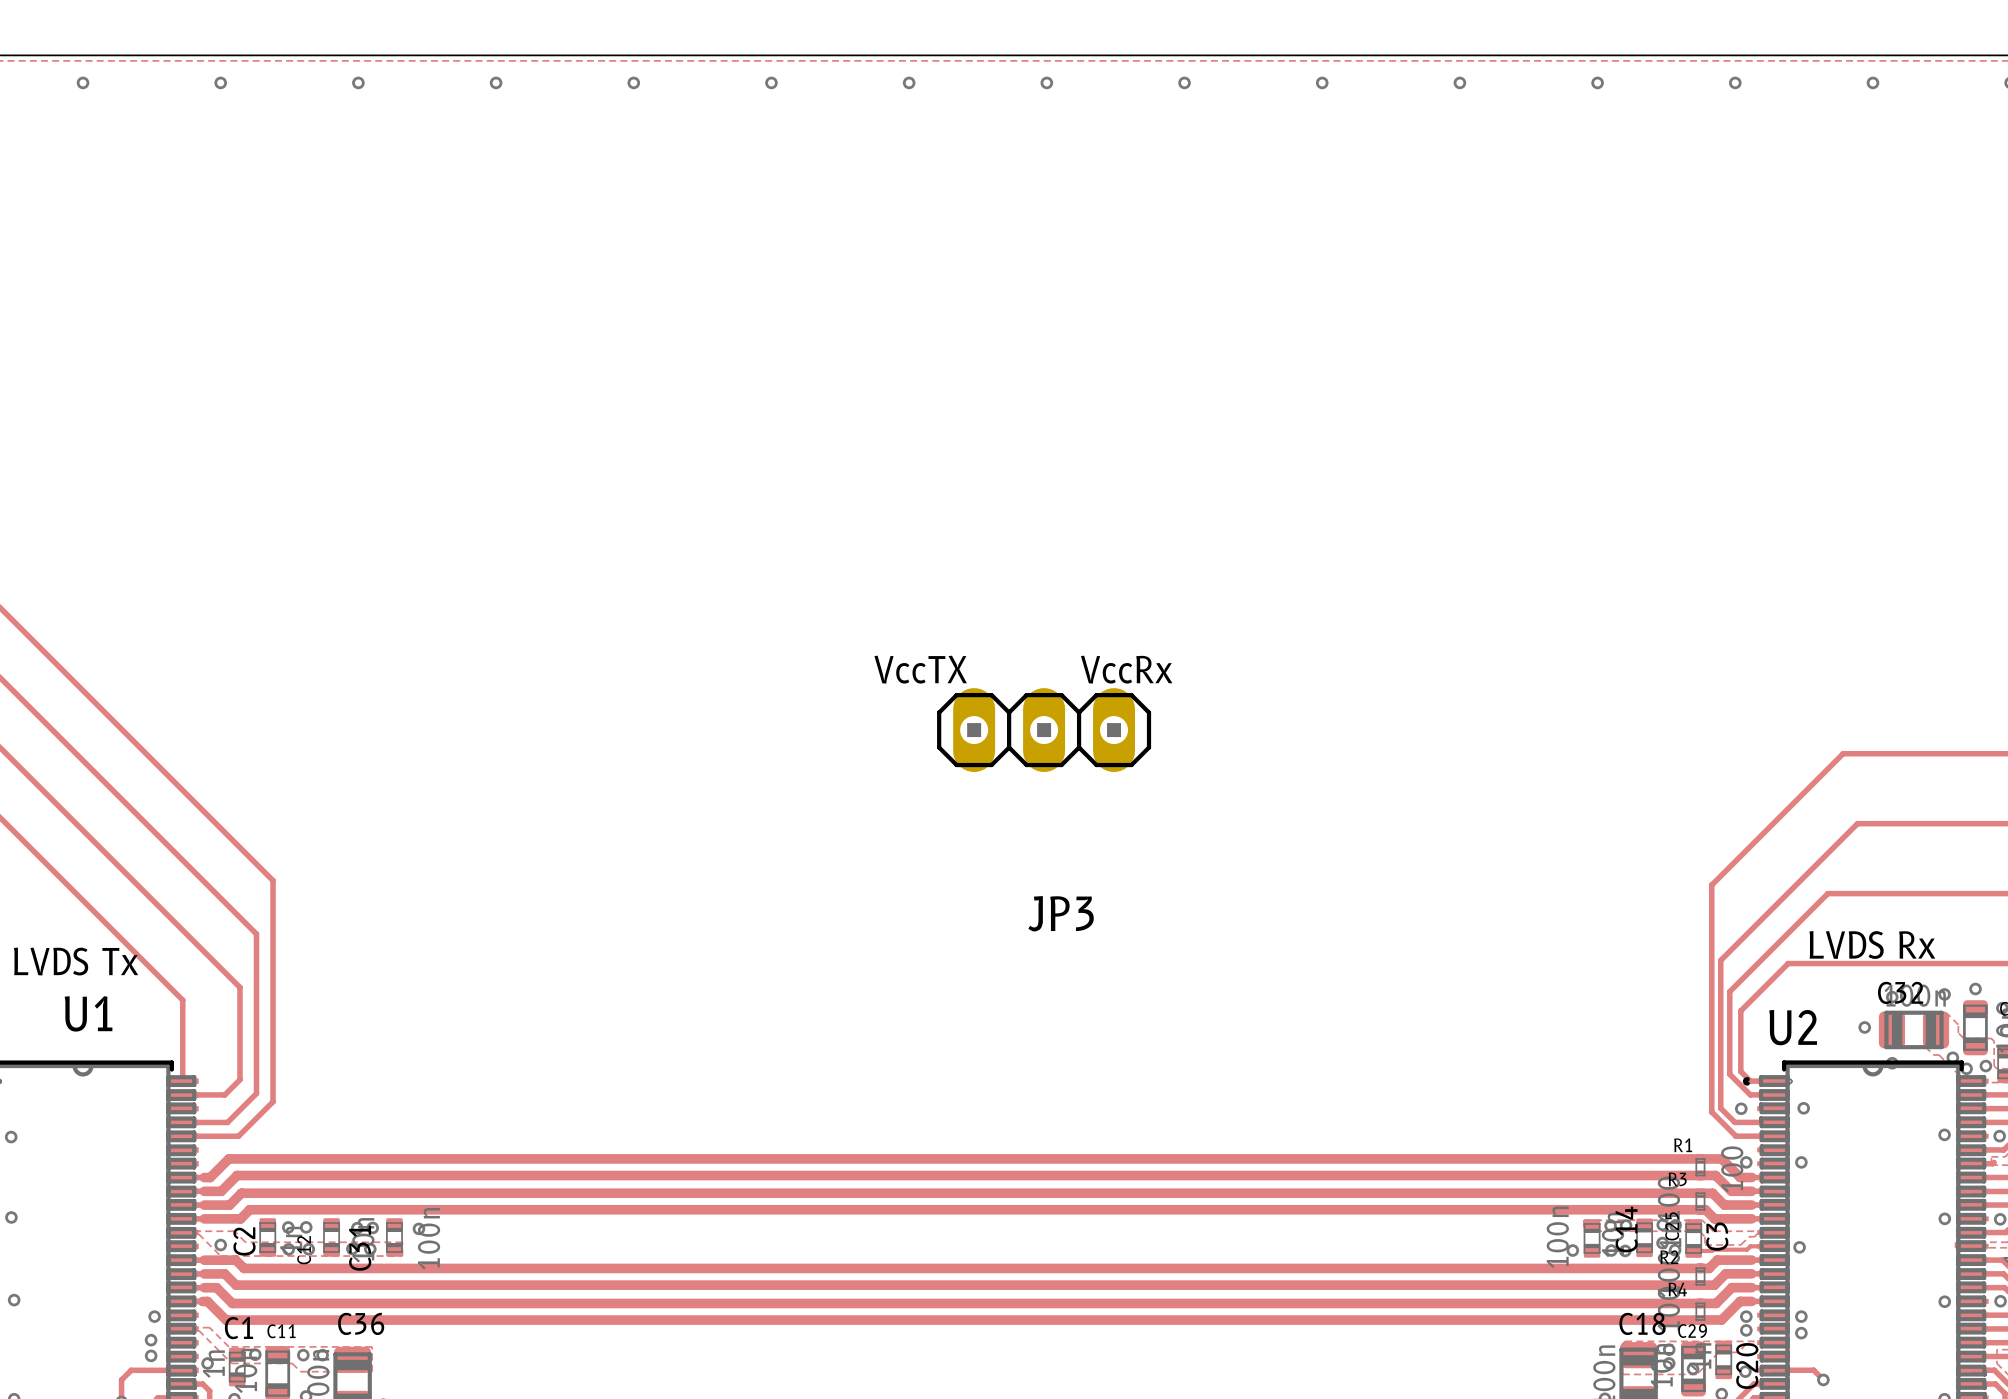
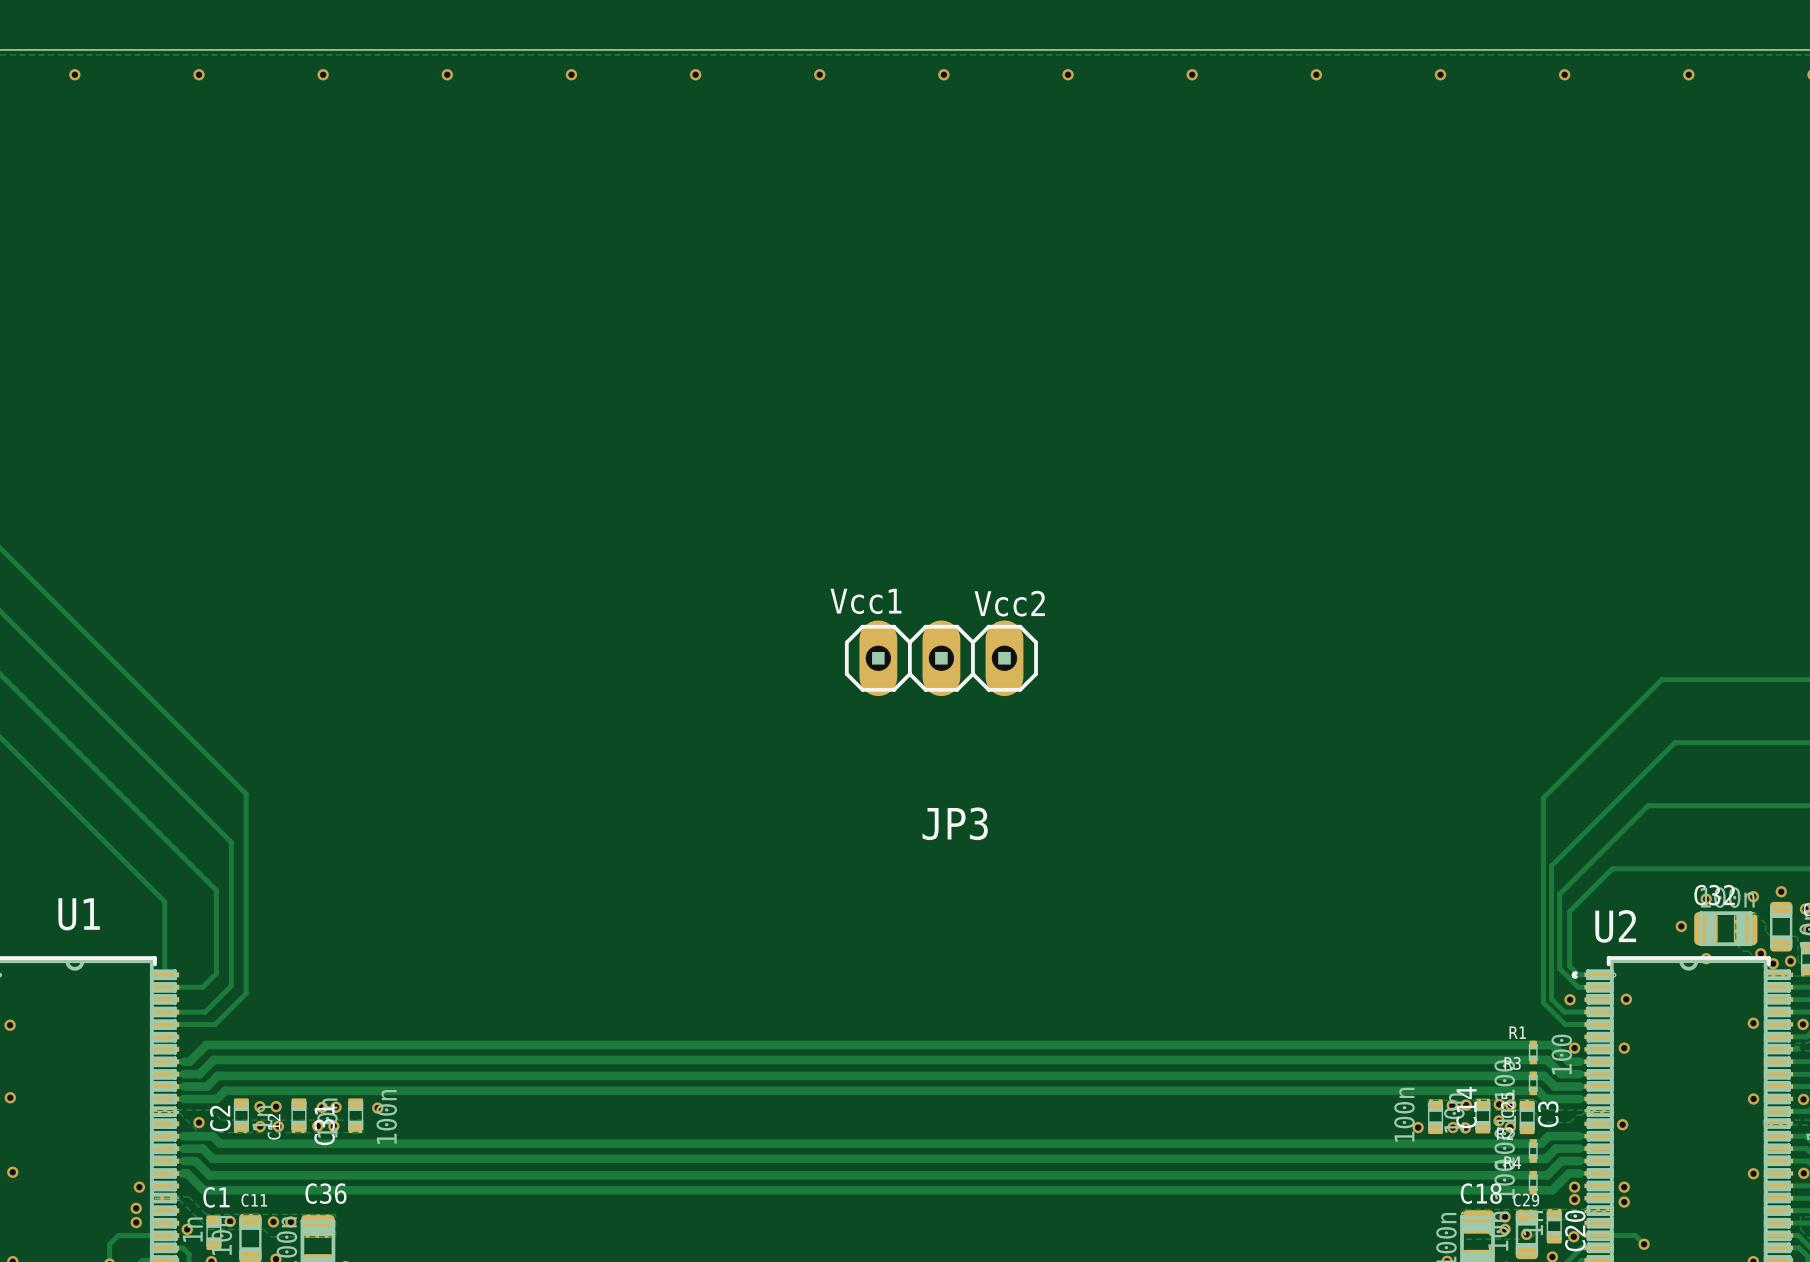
text: VccTX (920, 669) -> Vcc1 (865, 601)
text: VccRx (1126, 669) -> Vcc2 (1009, 603)
text: LVDS Rx (1872, 945) -> none
text: LVDS Tx (76, 961) -> none
track: (1773, 1246) (1750, 1246) (1747, 1249) (1693, 1250) -> none

